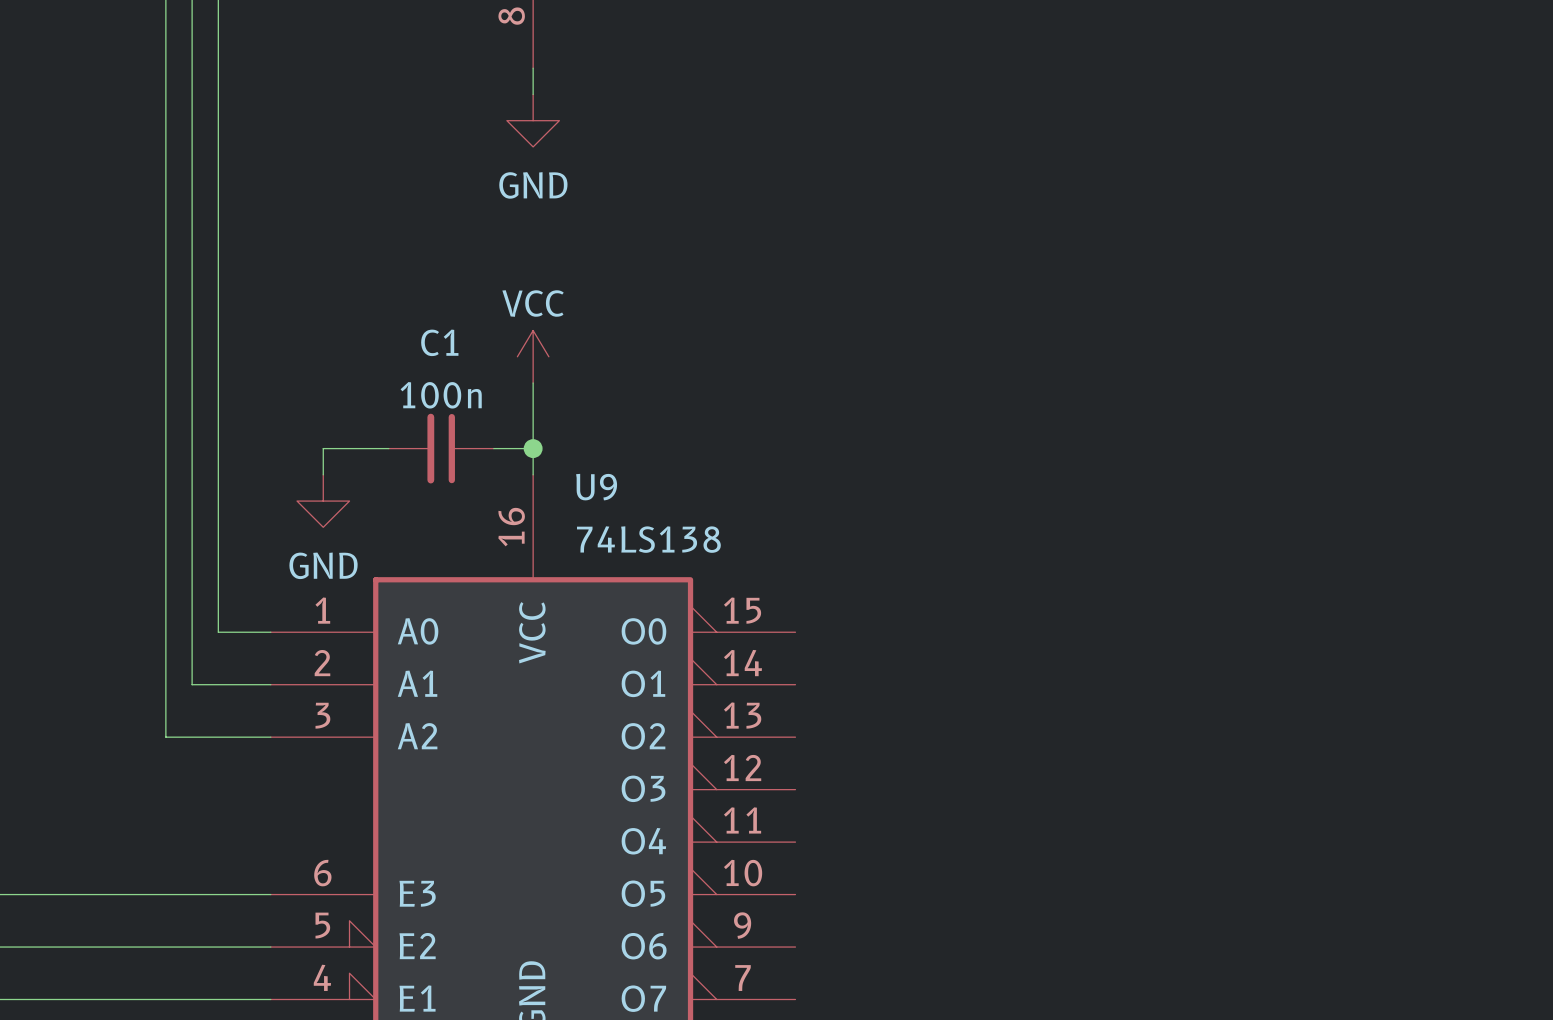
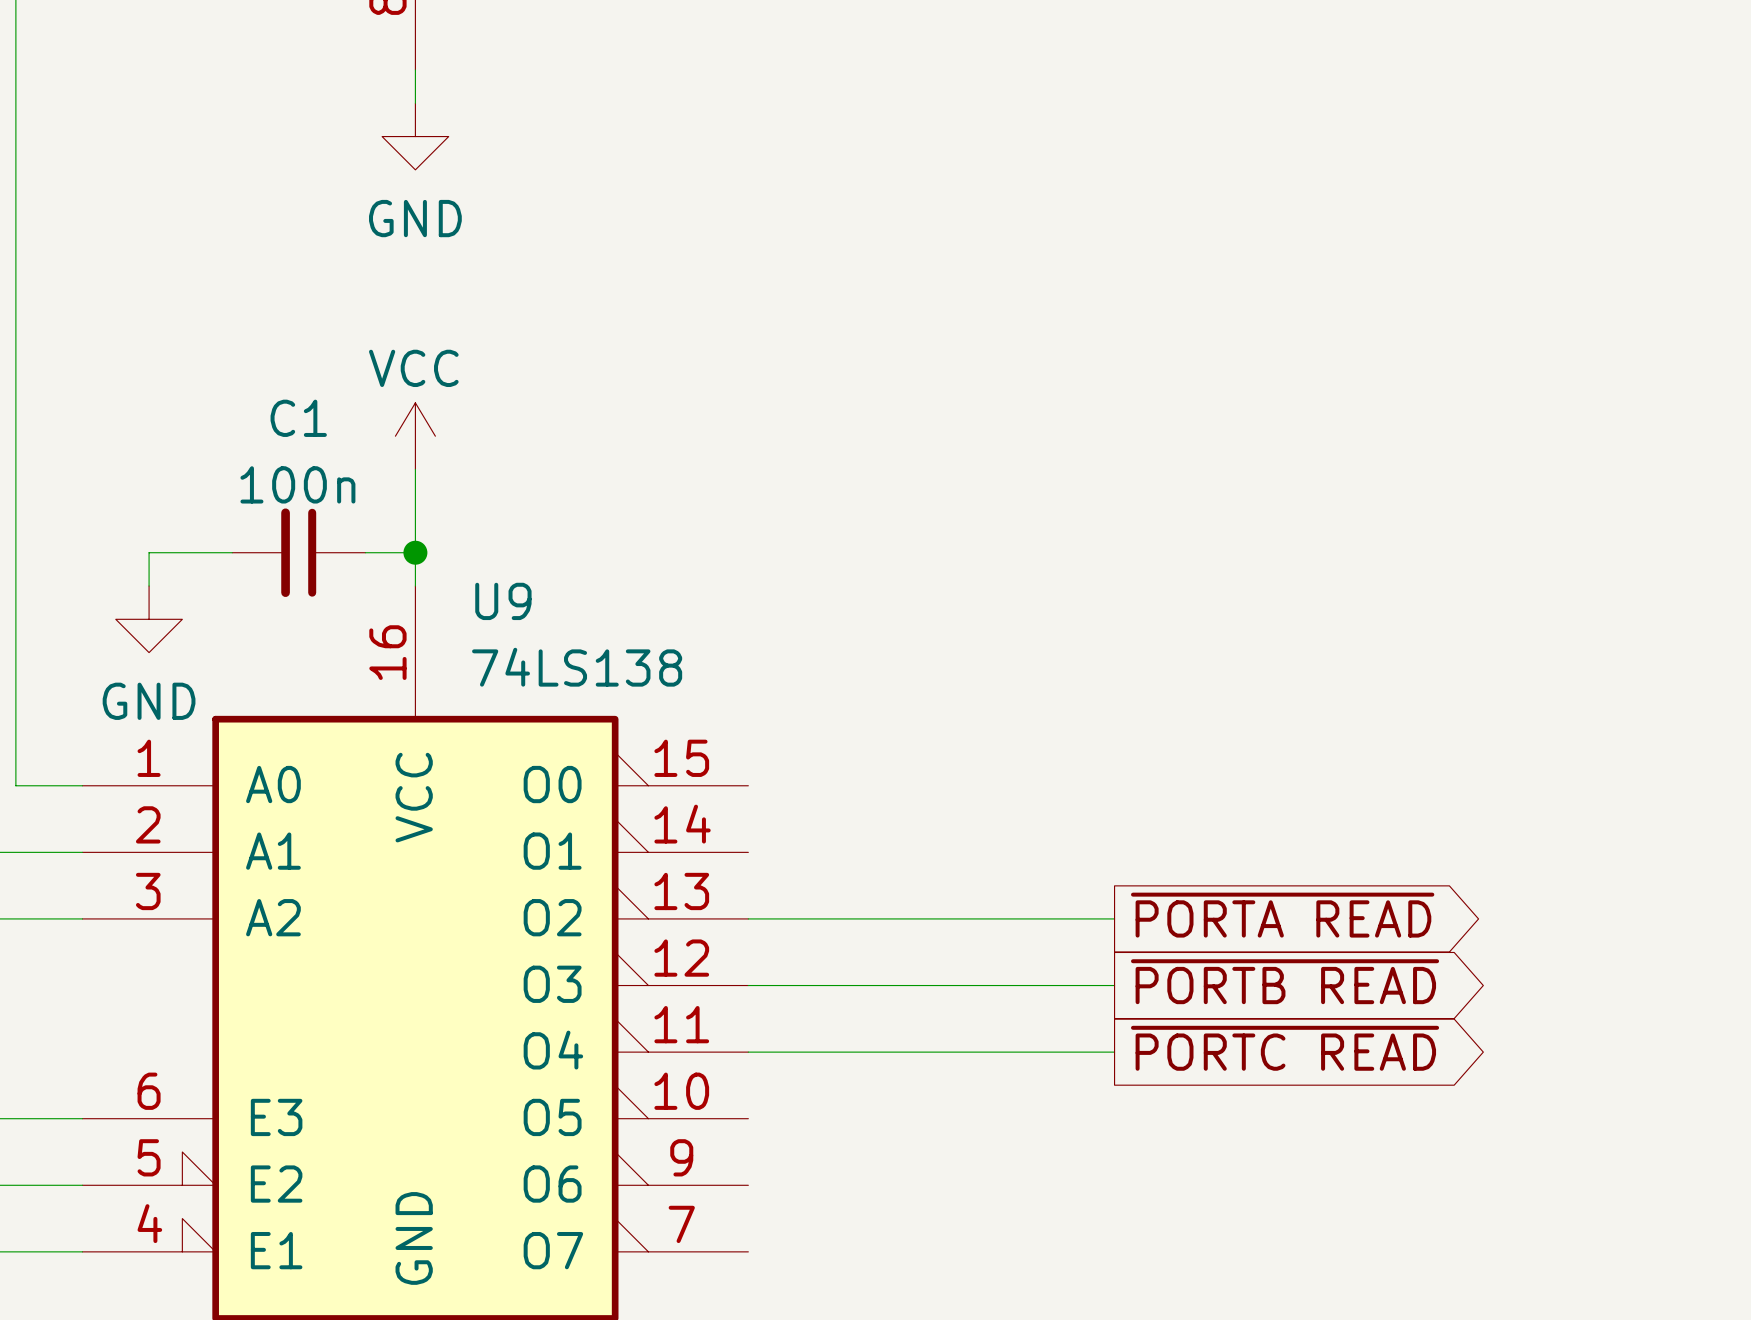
global label: none -> ~{PORTA READ} (1282, 915)
wire: none -> (748, 918) (1114, 918)
global label: none -> ~{PORTB READ} (1285, 981)
wire: none -> (748, 985) (1114, 985)
global label: none -> ~{PORTC READ} (1285, 1048)
wire: none -> (748, 1052) (1114, 1052)

